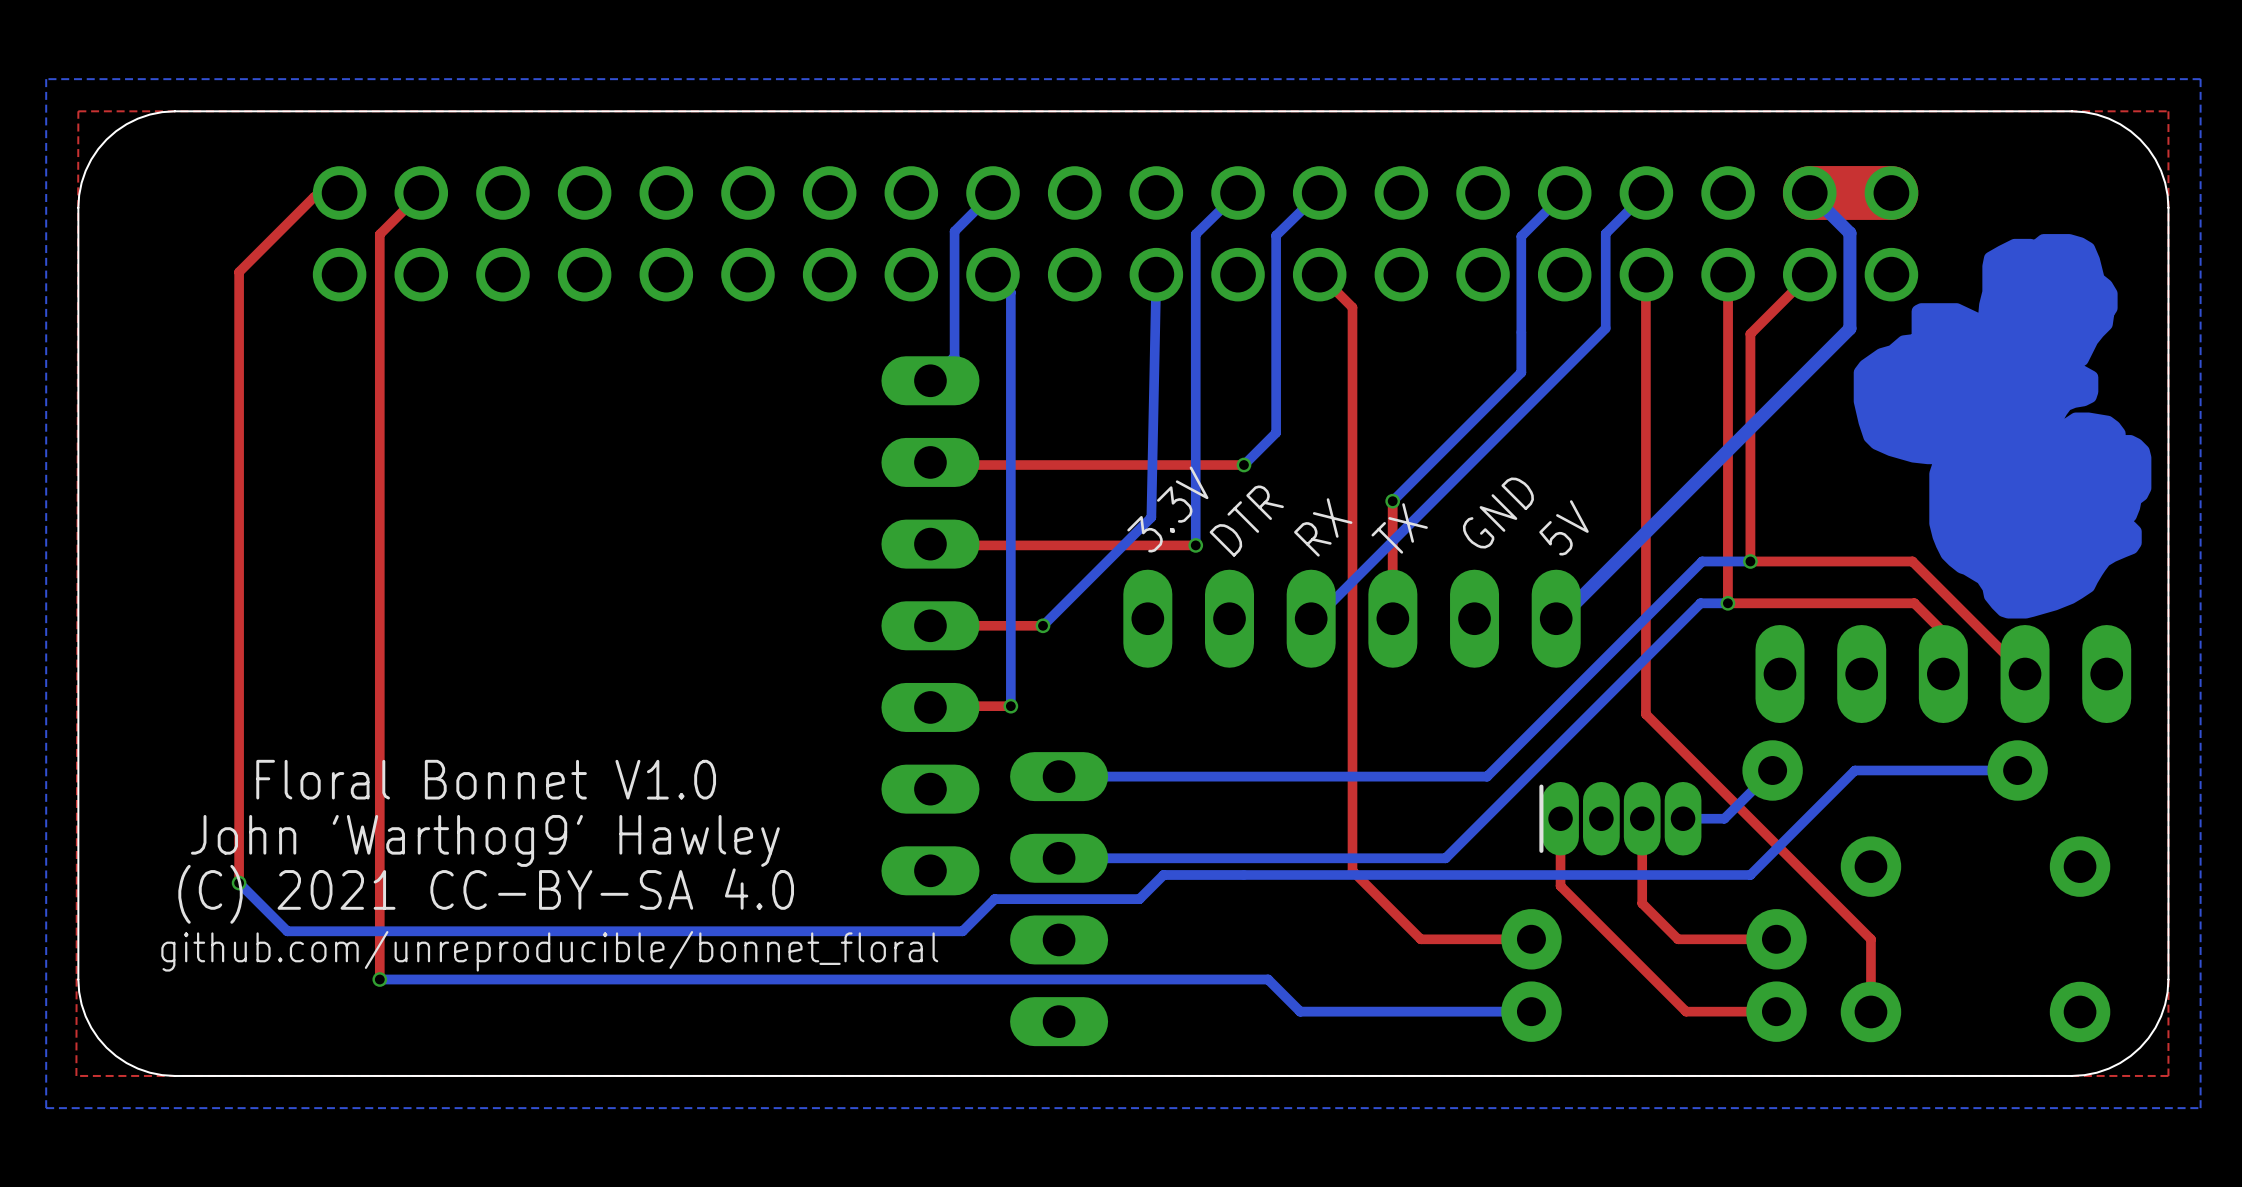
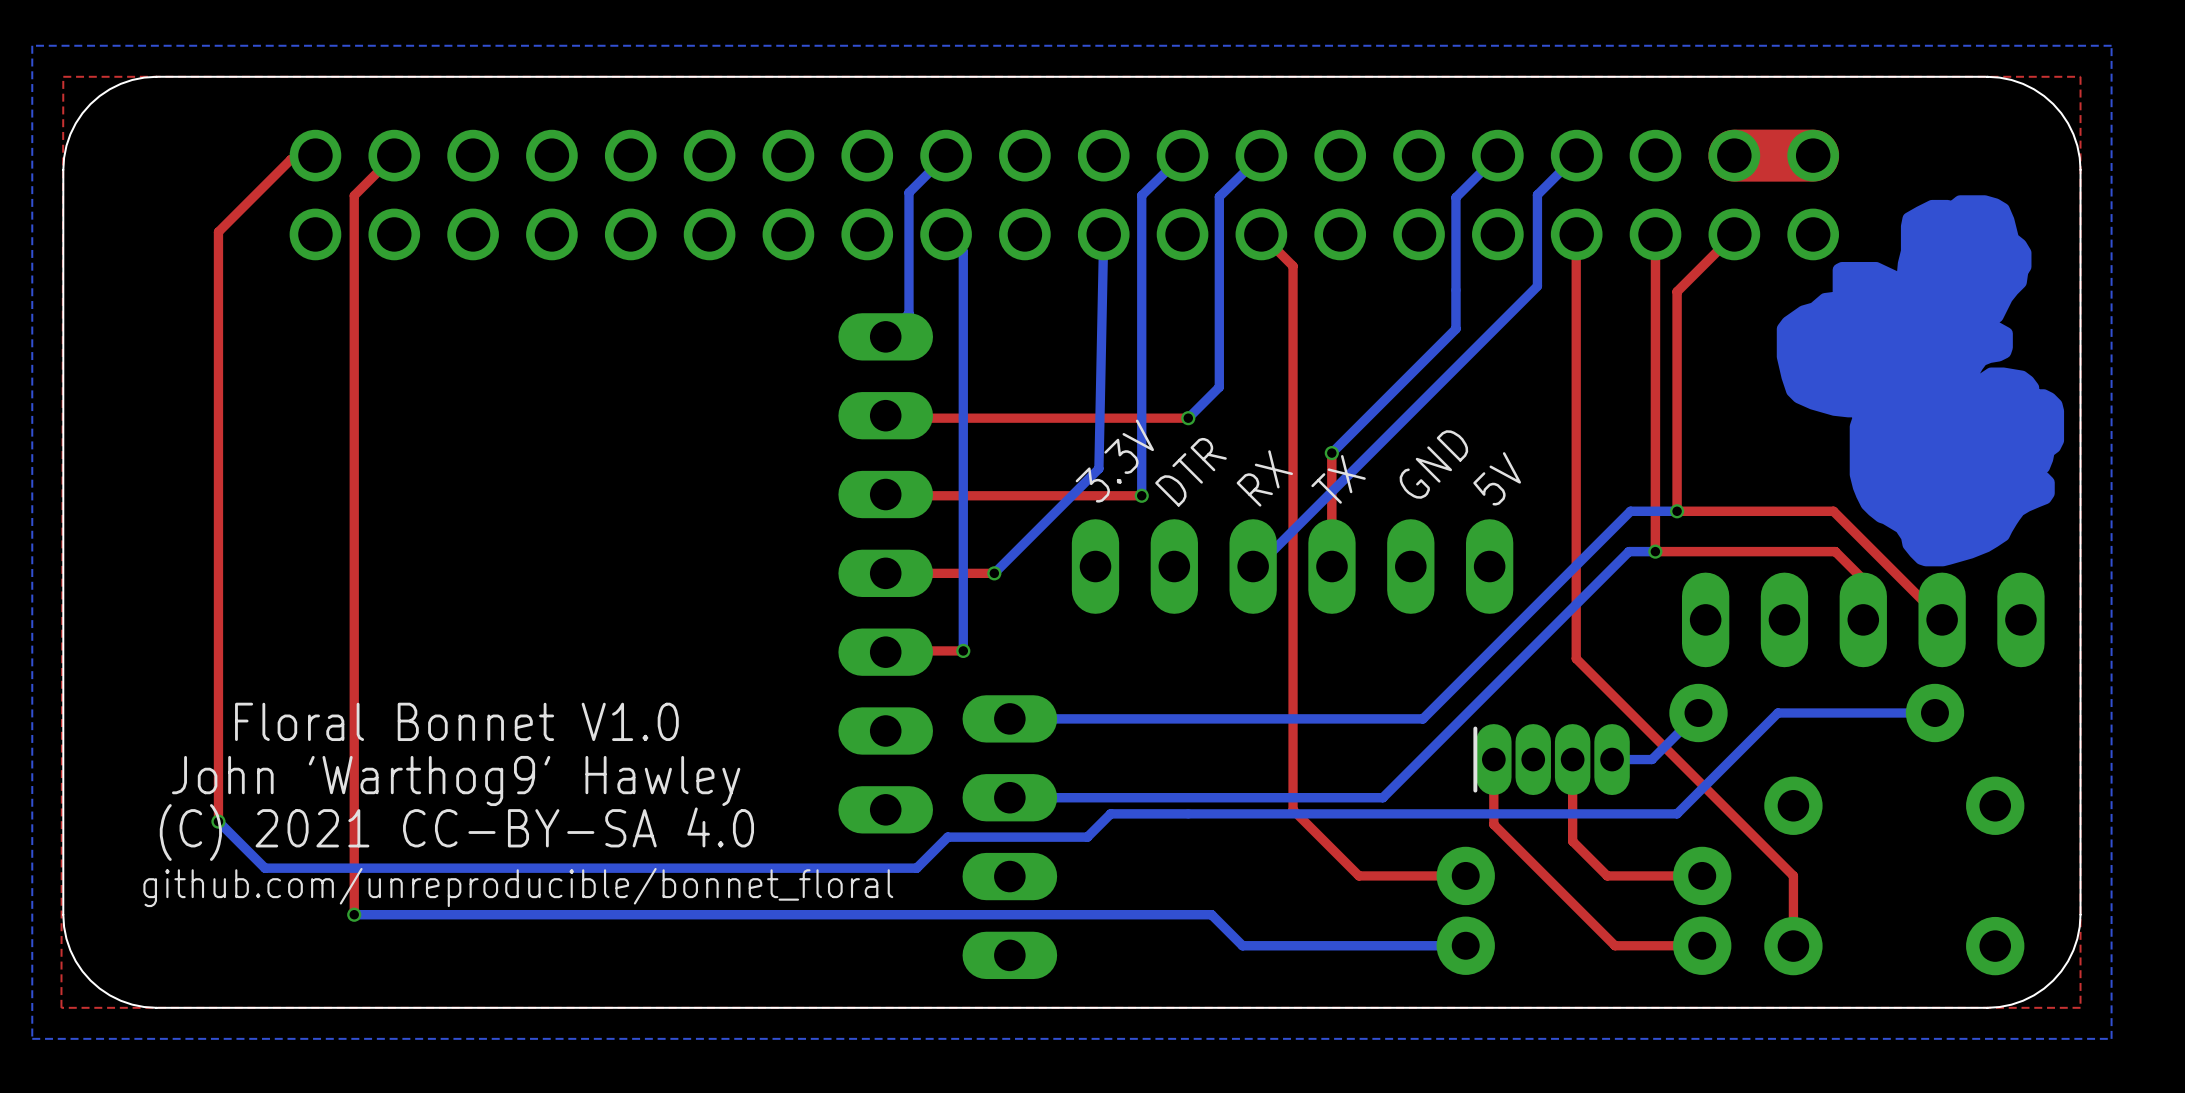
bottom track: (1809, 192) (1849, 233) (1849, 328) (1559, 618) (1556, 618) -> none

